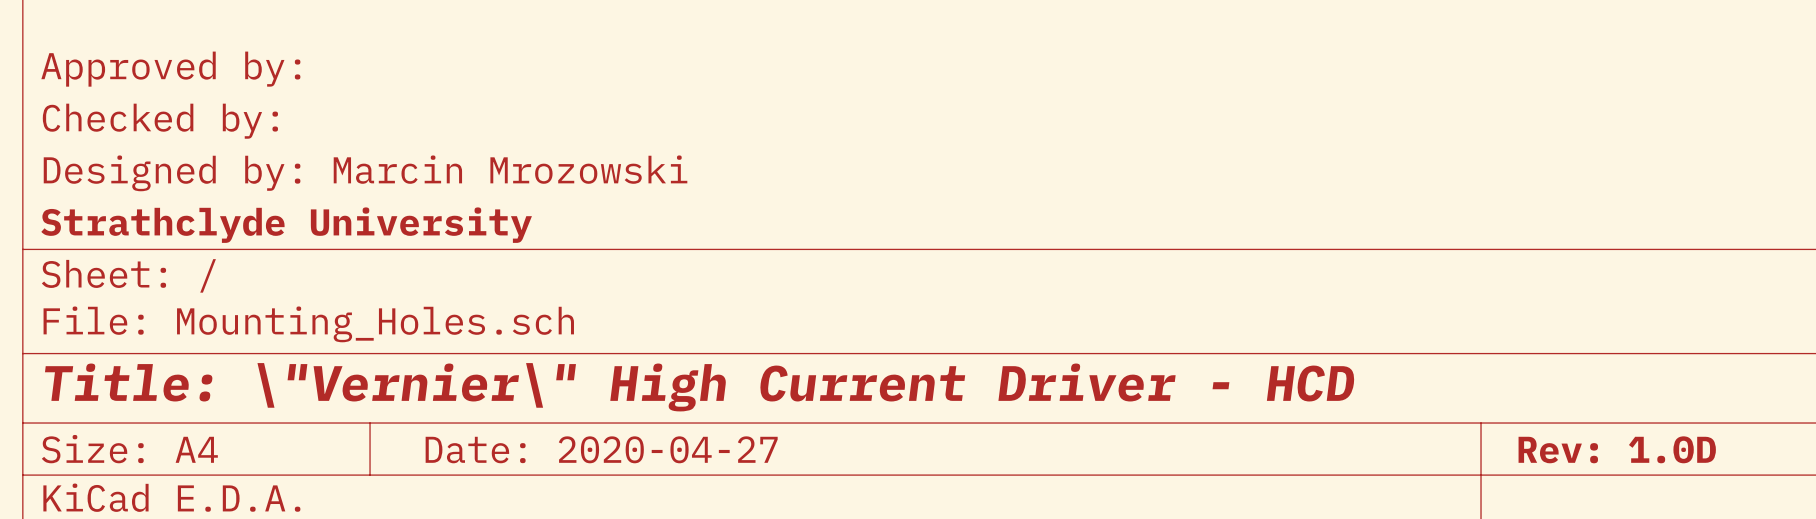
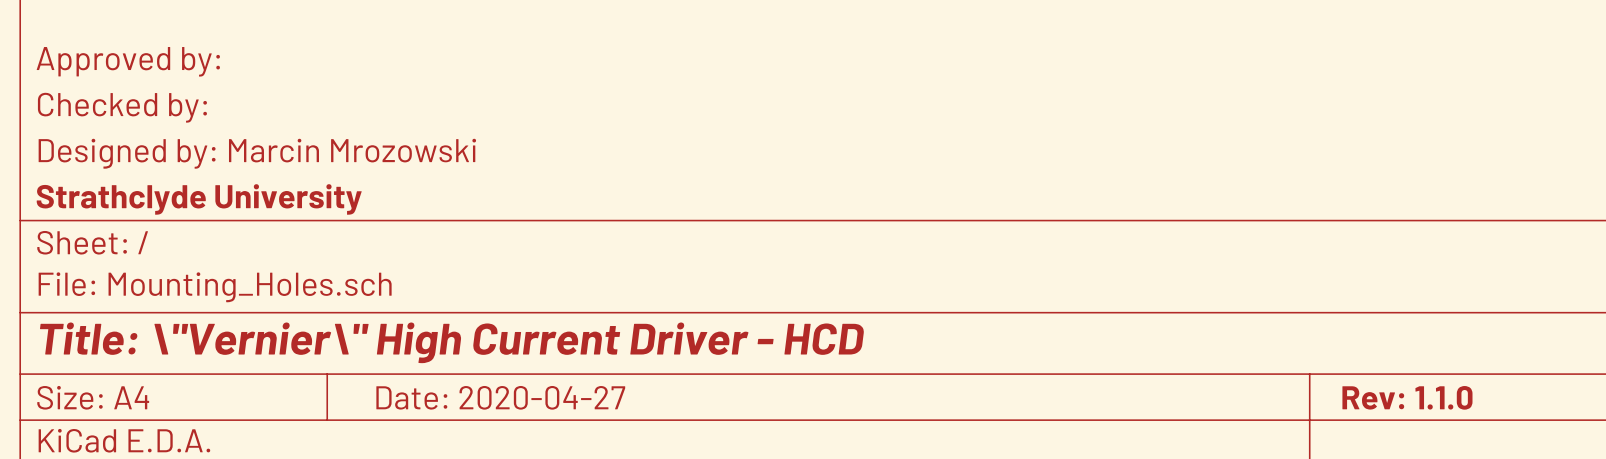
title block: Rev: 1.0D (1617, 449) -> Rev: 1.1.0 (1407, 397)

